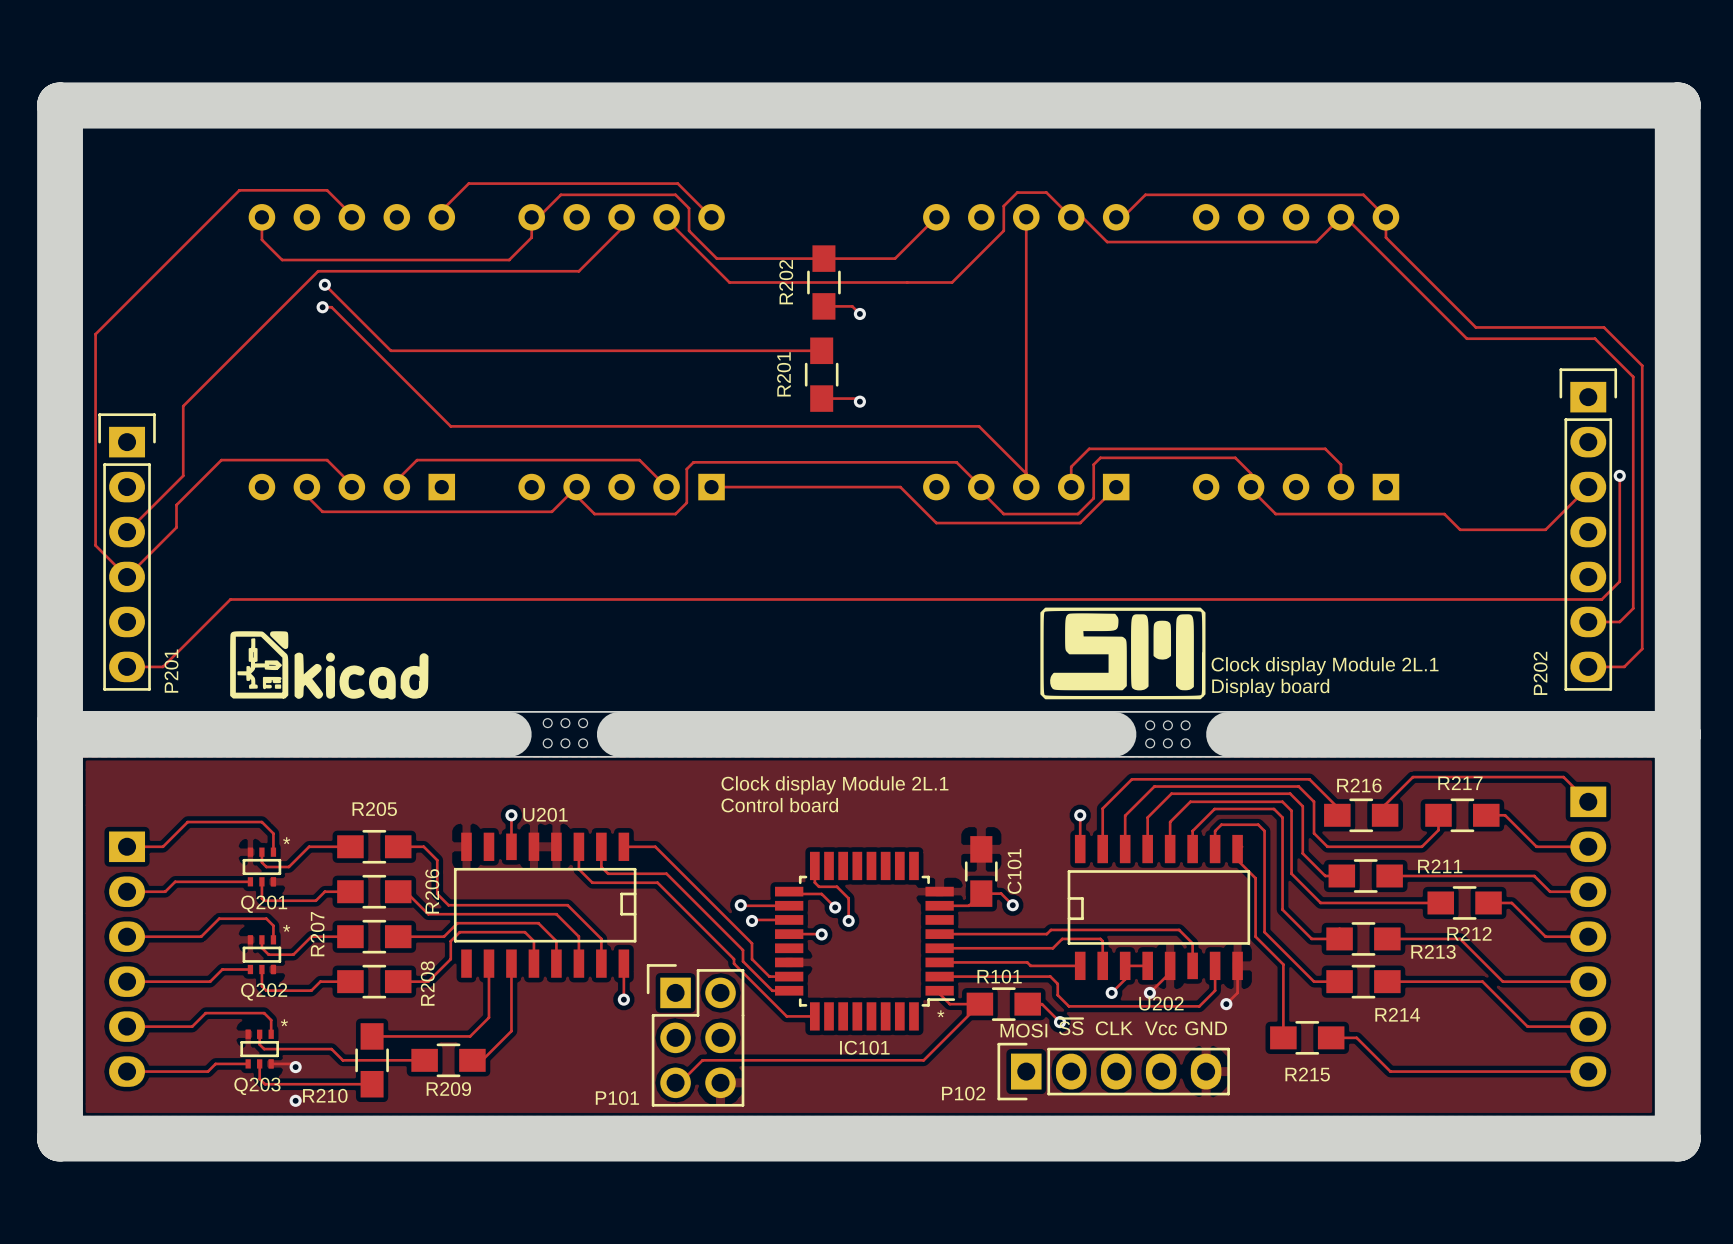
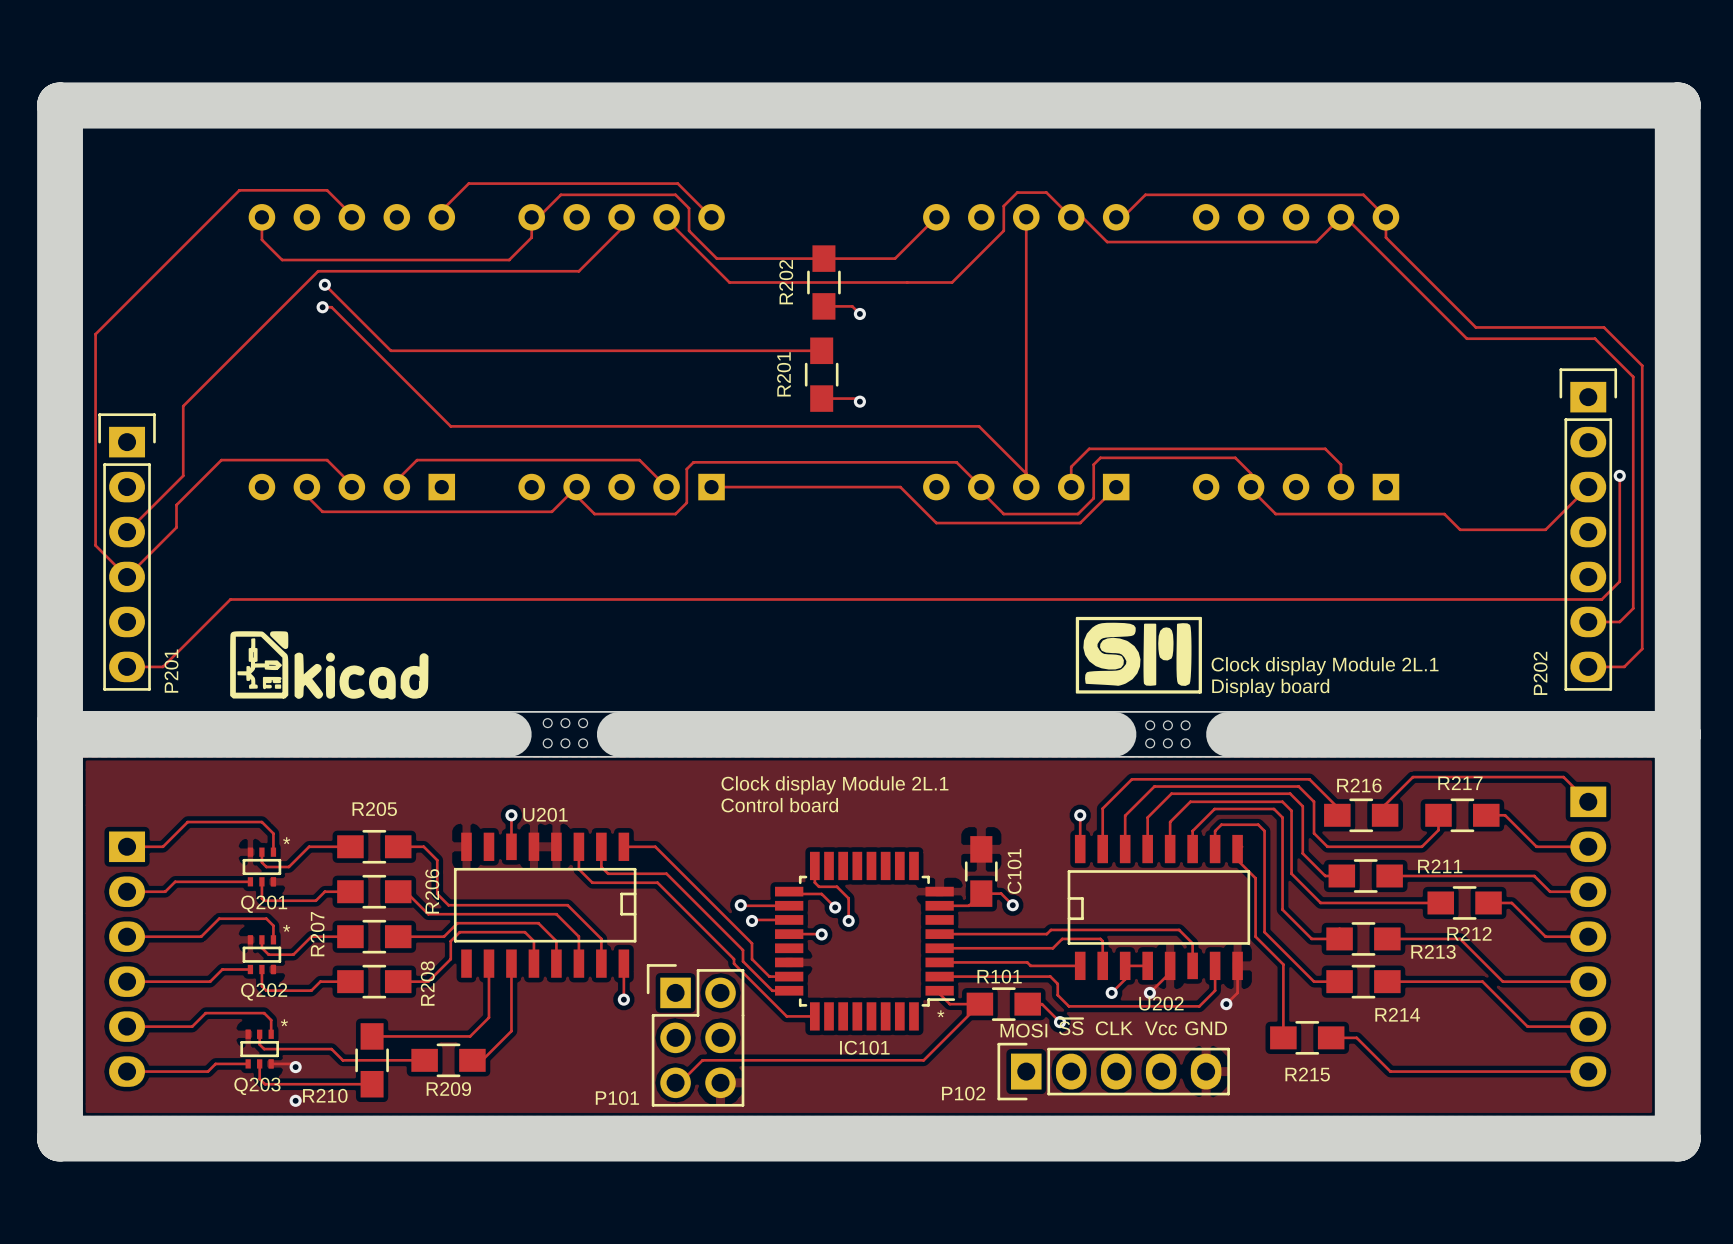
drawing shape: [1040, 607, 1206, 700] -> [1075, 616, 1202, 694]

